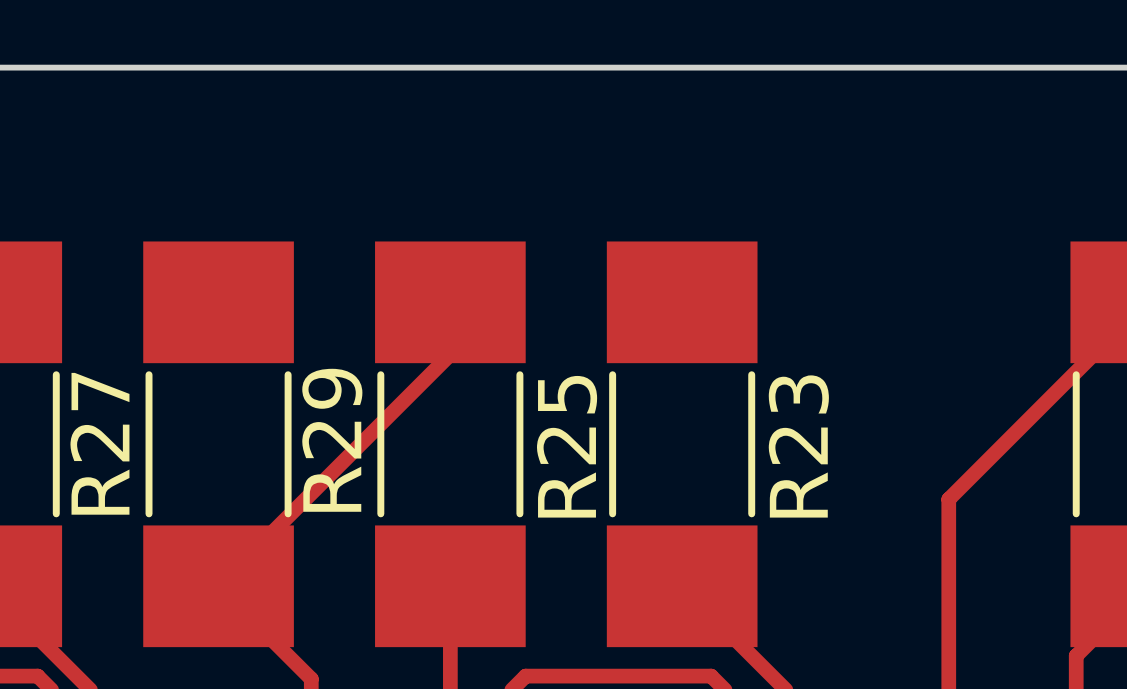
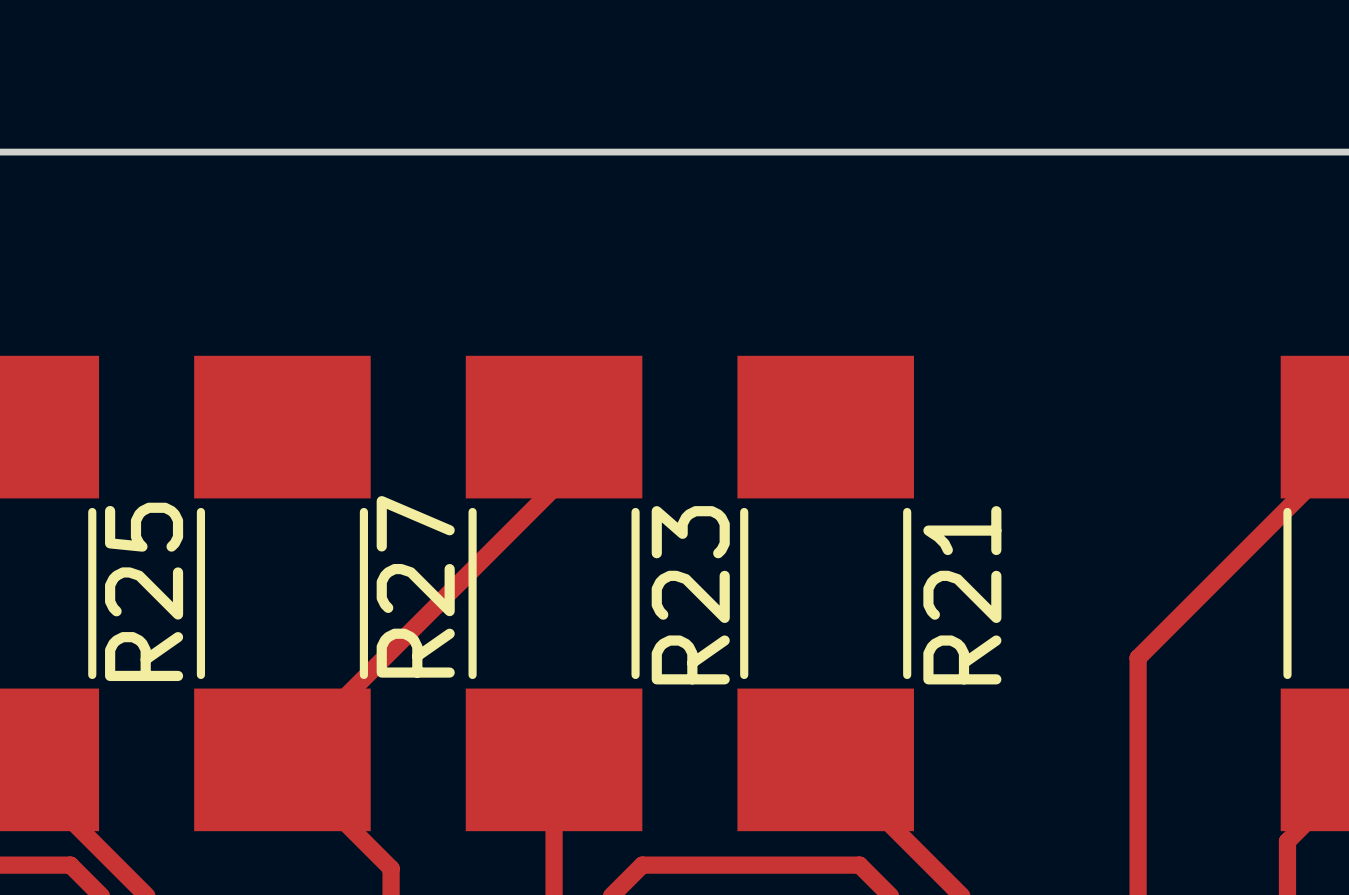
R29 name: R29 (332, 440) -> R27 (415, 586)
R27 name: R27 (99, 443) -> R25 (144, 591)
R25 name: R25 (567, 446) -> R23 (690, 595)
R23 name: R23 (798, 446) -> R21 (962, 595)

